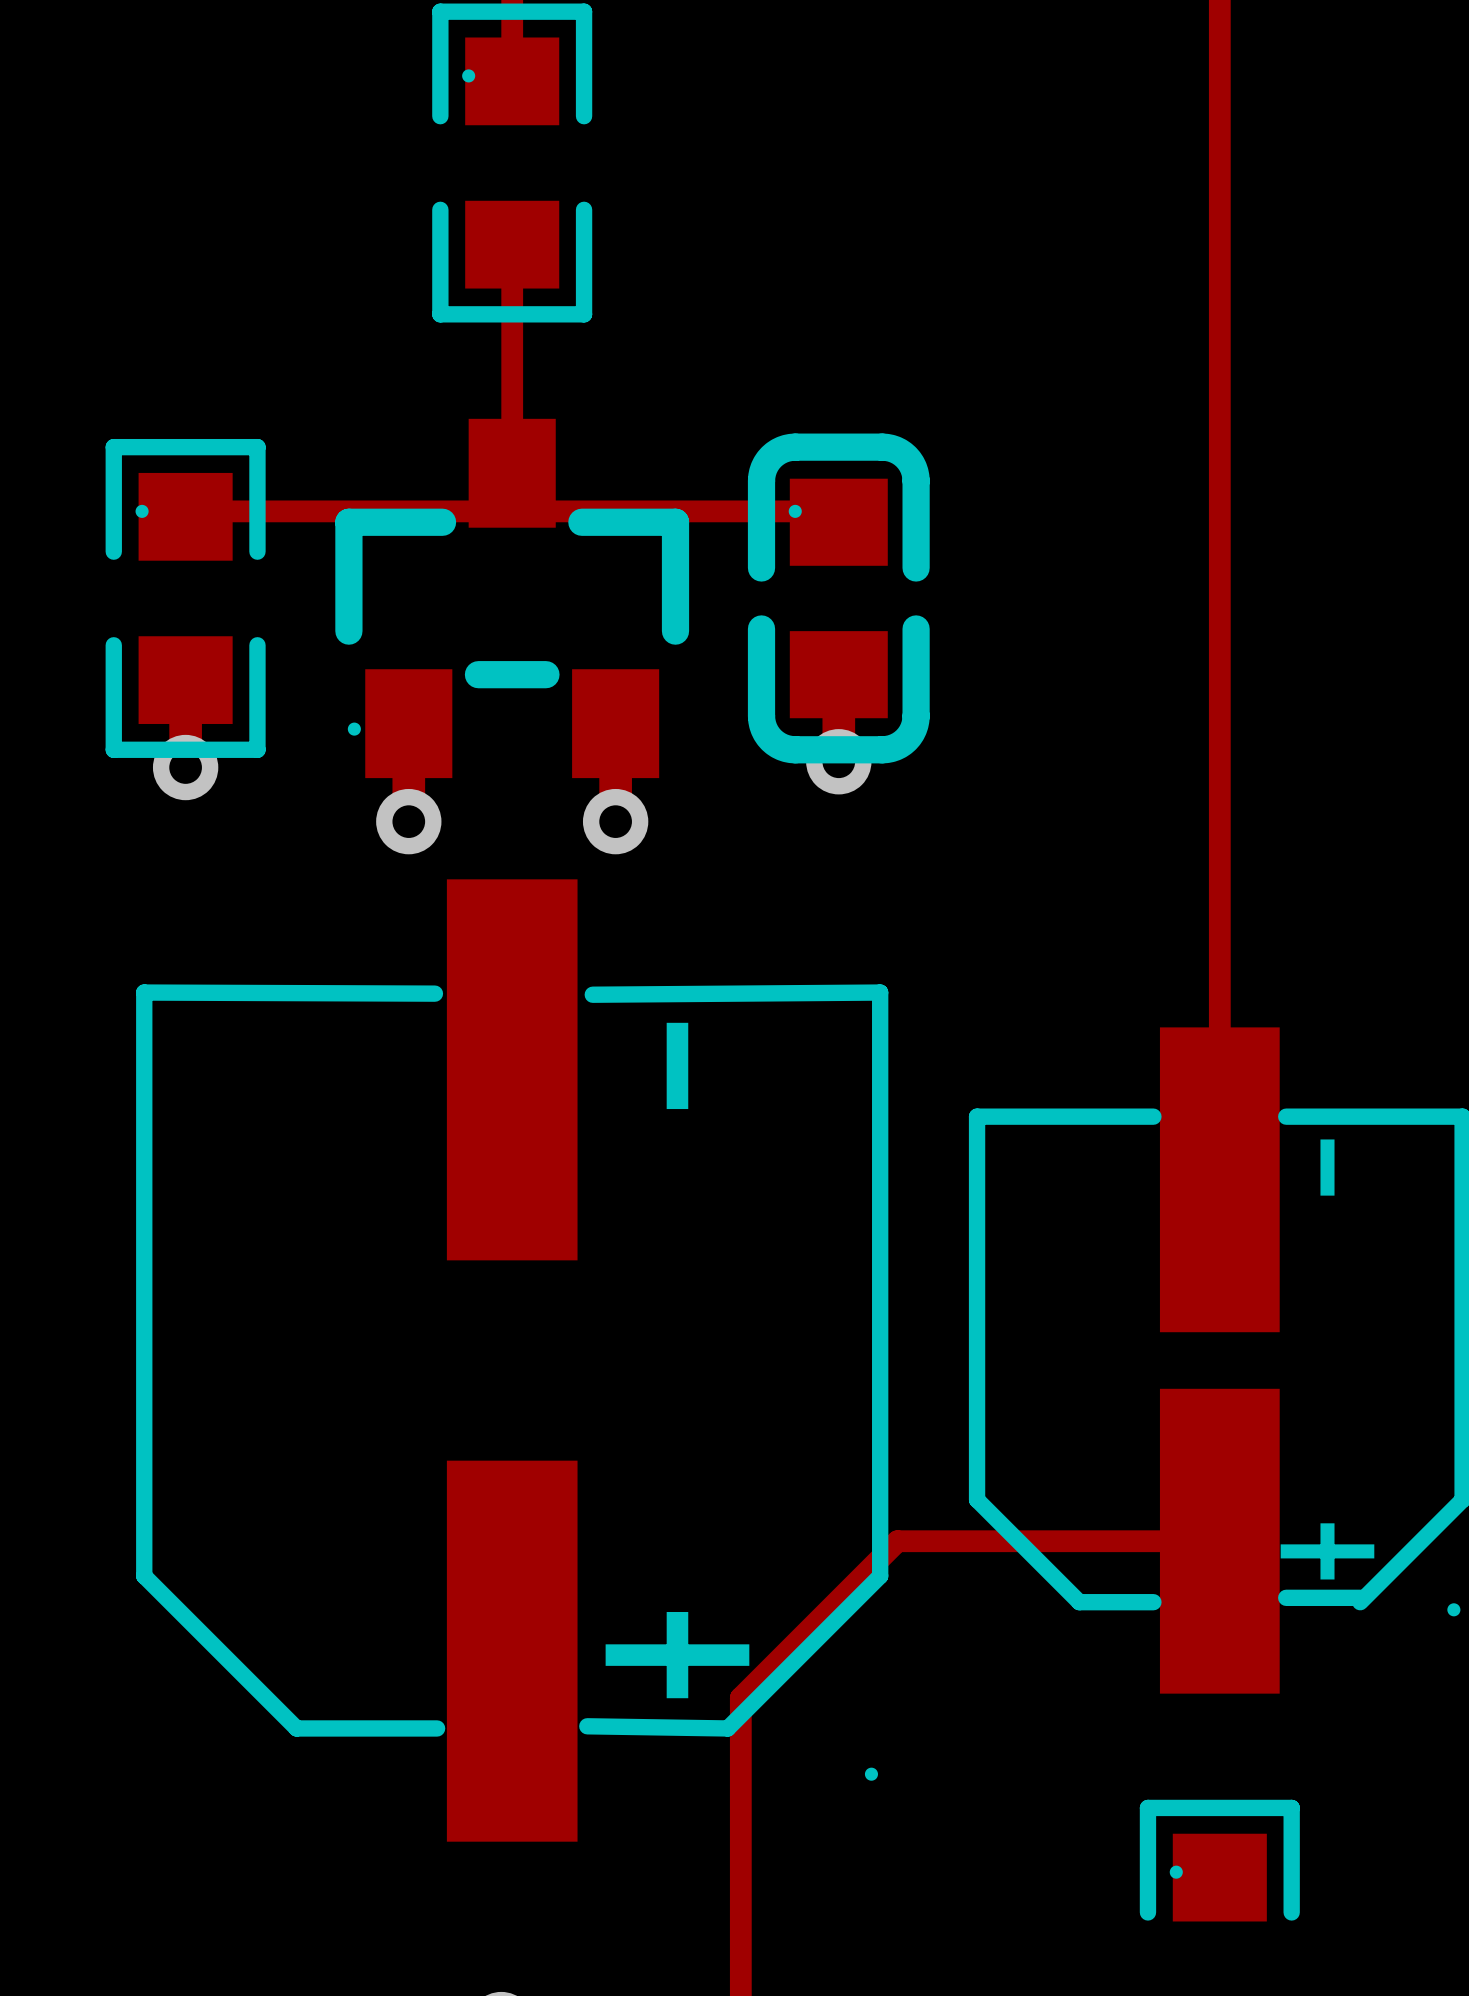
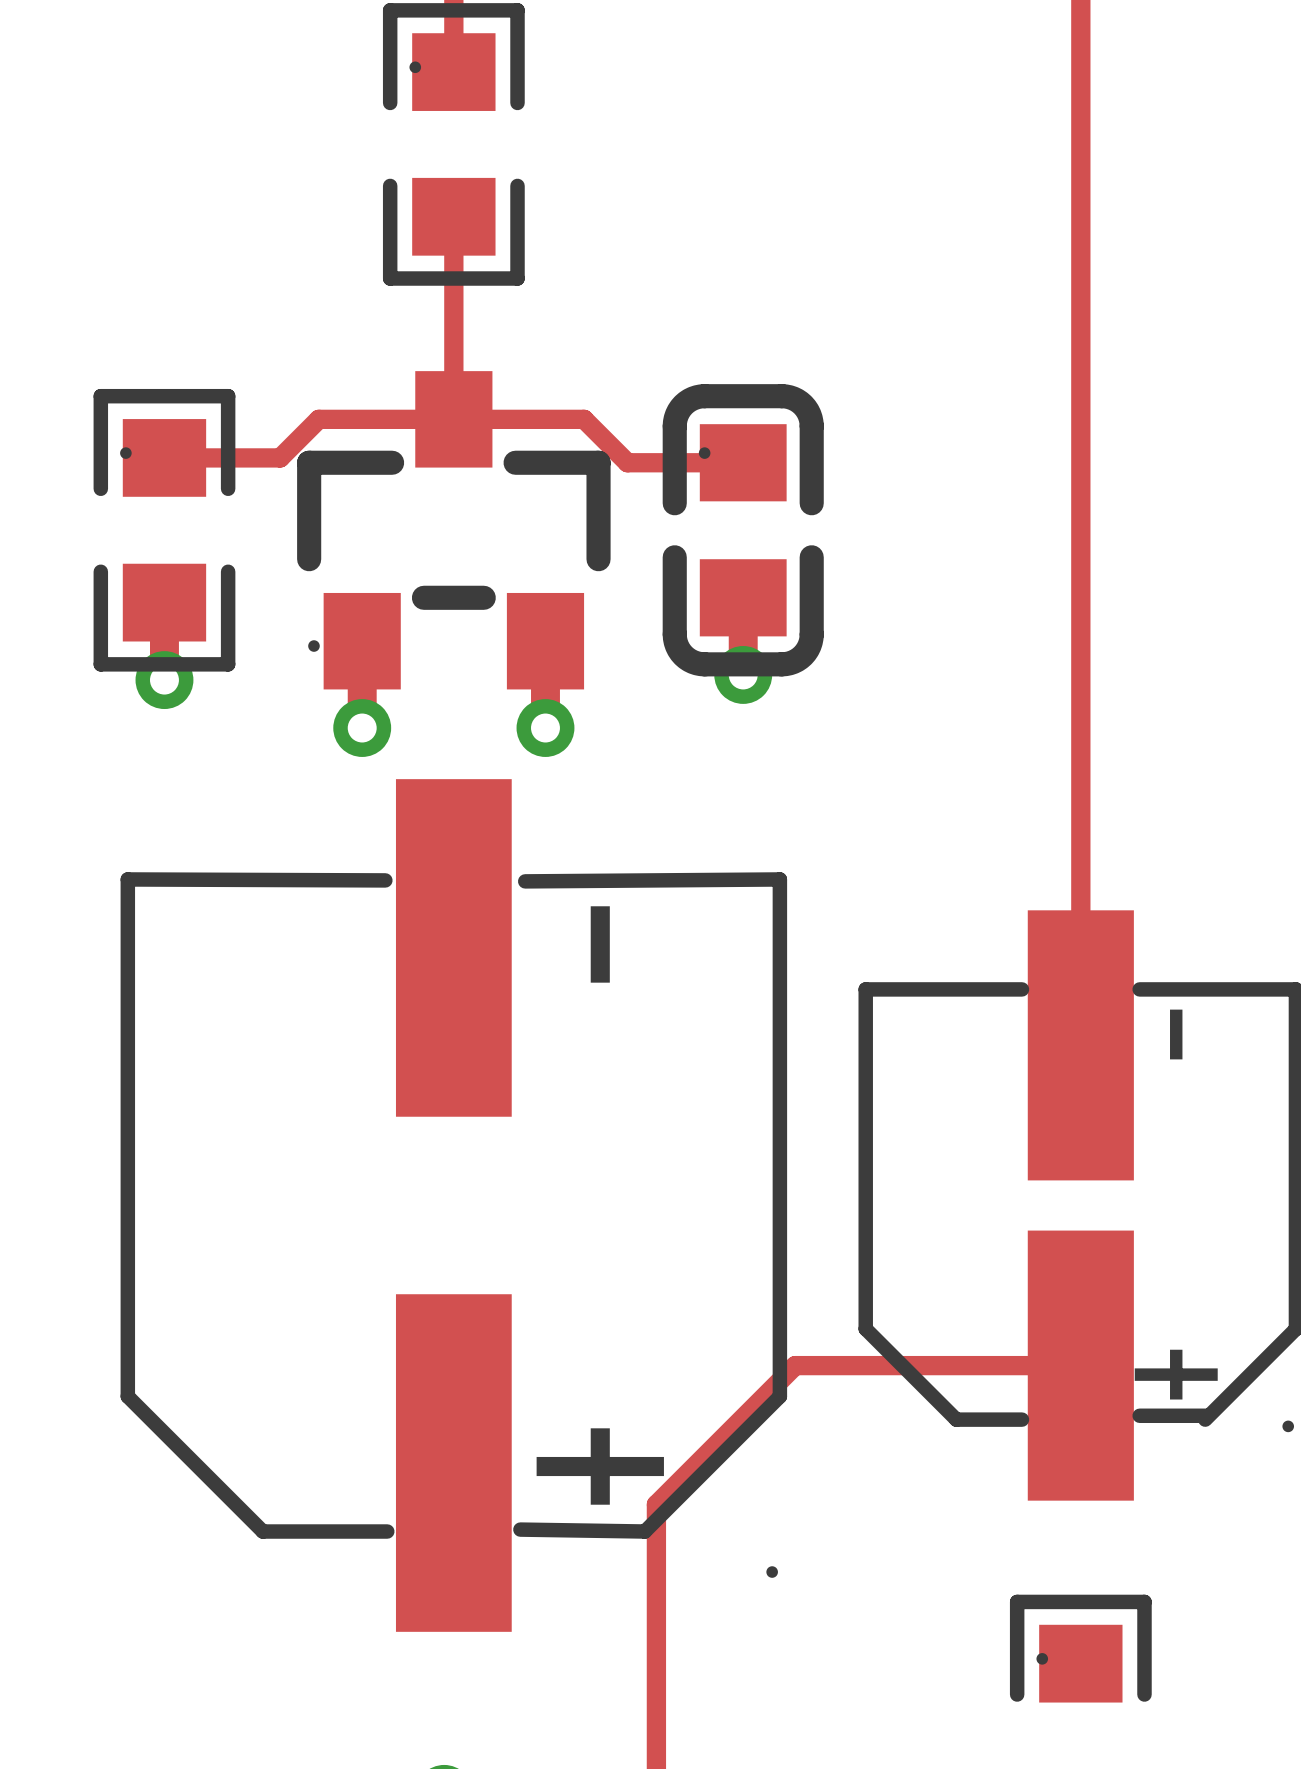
top track: (185, 516) (191, 511) (474, 511) (512, 473) (550, 511) (827, 511) (838, 522) -> (164, 457) (280, 457) (318, 419) (584, 419) (627, 462) (743, 462)

